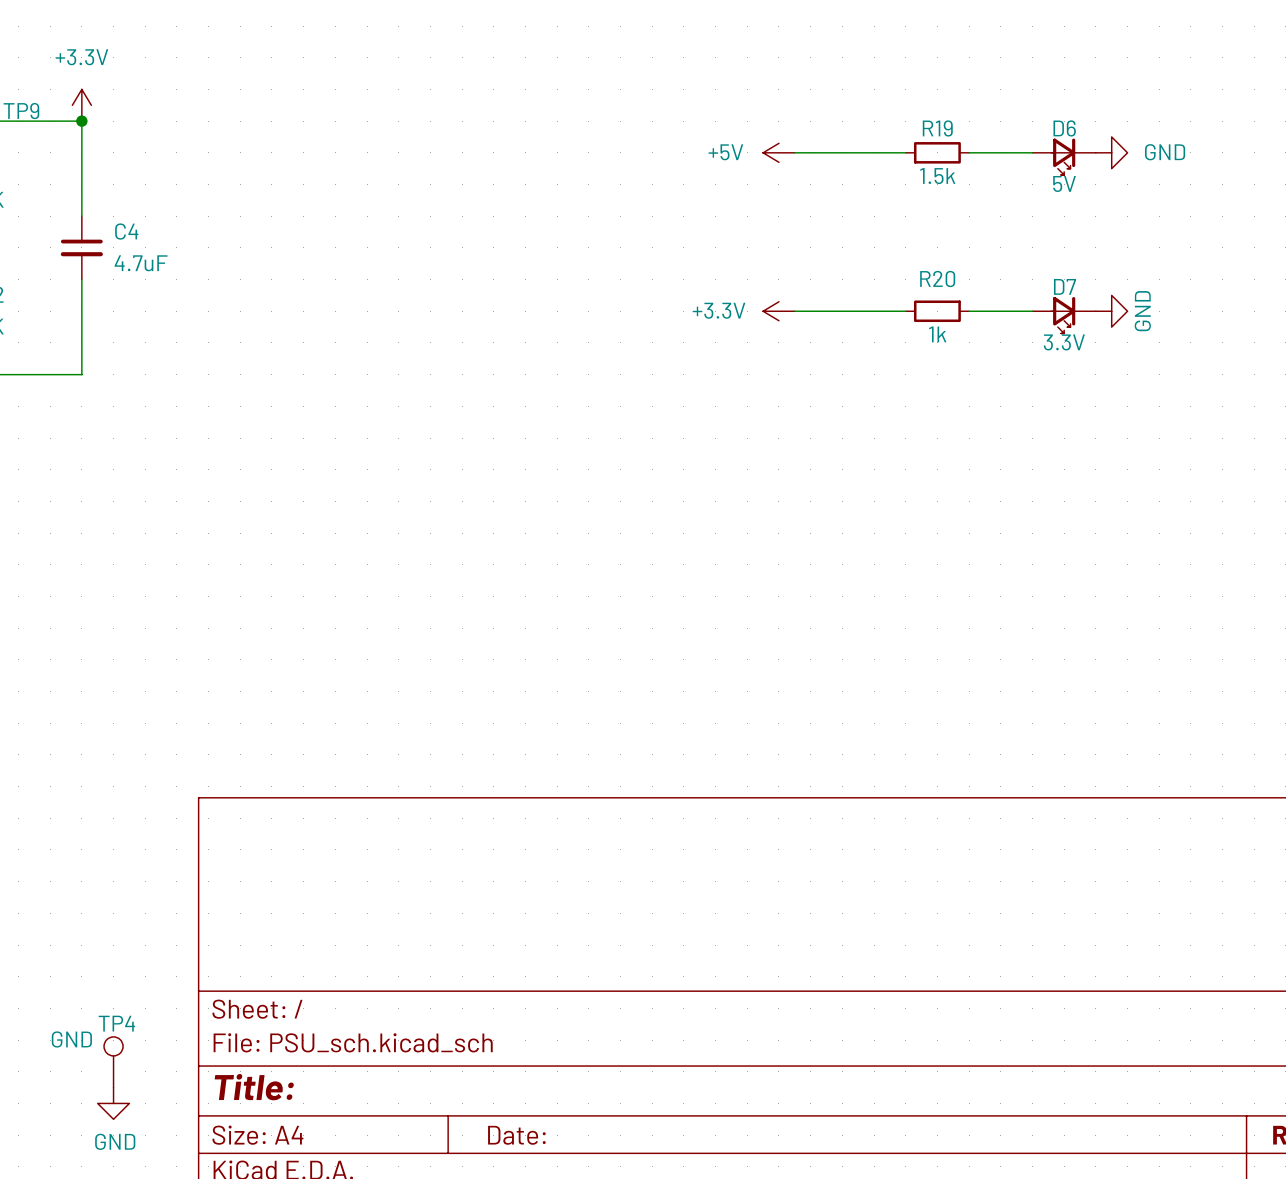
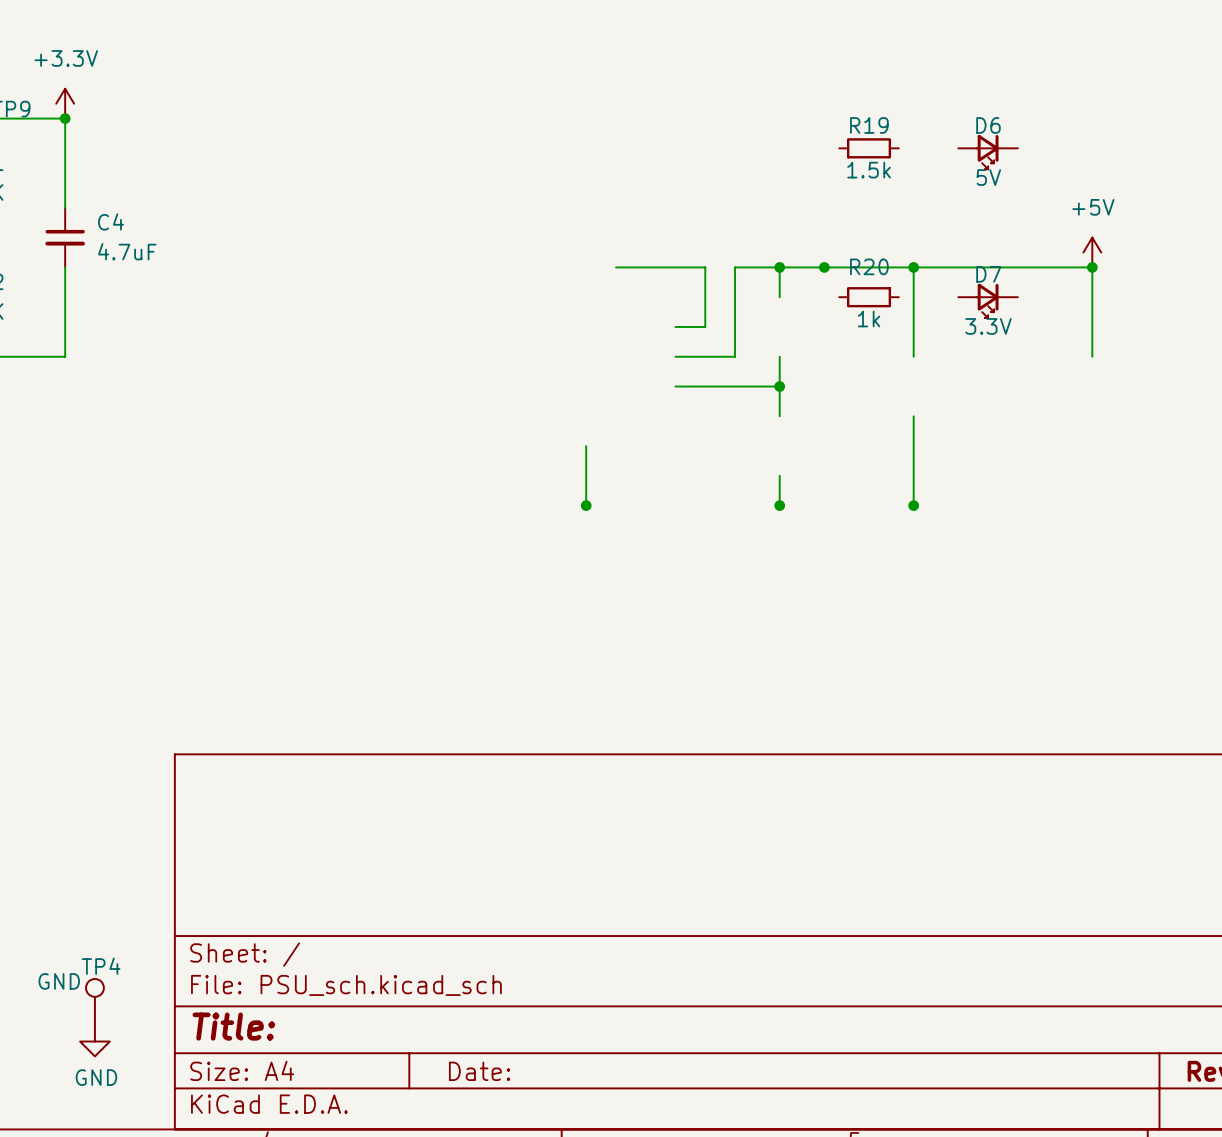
power symbol: +5V (778, 152) -> none
wire: (794, 152) (905, 152) -> none
wire: (969, 152) (1032, 152) -> none
power symbol: GND (1111, 152) -> none
power symbol: none -> +5V (1092, 252)
wire: none -> (615, 267) (705, 267) (705, 326) (675, 326)
wire: none -> (779, 267) (779, 297)
junction: none -> (779, 267)
junction: none -> (824, 267)
wire: none -> (913, 267) (913, 356)
junction: none -> (913, 267)
junction: none -> (1092, 267)
power symbol: +3.3V (778, 311) -> none
wire: (794, 311) (905, 311) -> (675, 386) (779, 386)
wire: (969, 311) (1032, 311) -> none
power symbol: GND (1111, 311) -> none
wire: none -> (675, 356) (735, 356) (735, 267) (1092, 267) (1092, 356)
wire: none -> (779, 356) (779, 416)
junction: none -> (779, 386)
wire: none -> (913, 416) (913, 505)
wire: none -> (586, 446) (586, 505)
wire: none -> (779, 475) (779, 505)
junction: none -> (586, 505)
junction: none -> (779, 505)
junction: none -> (913, 505)

